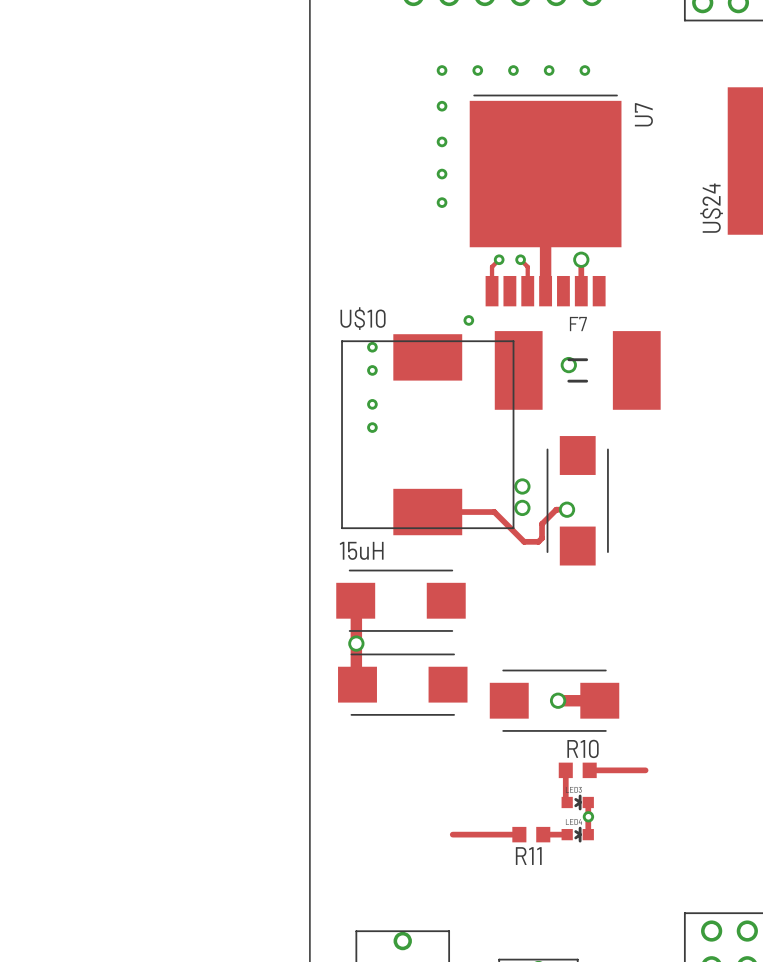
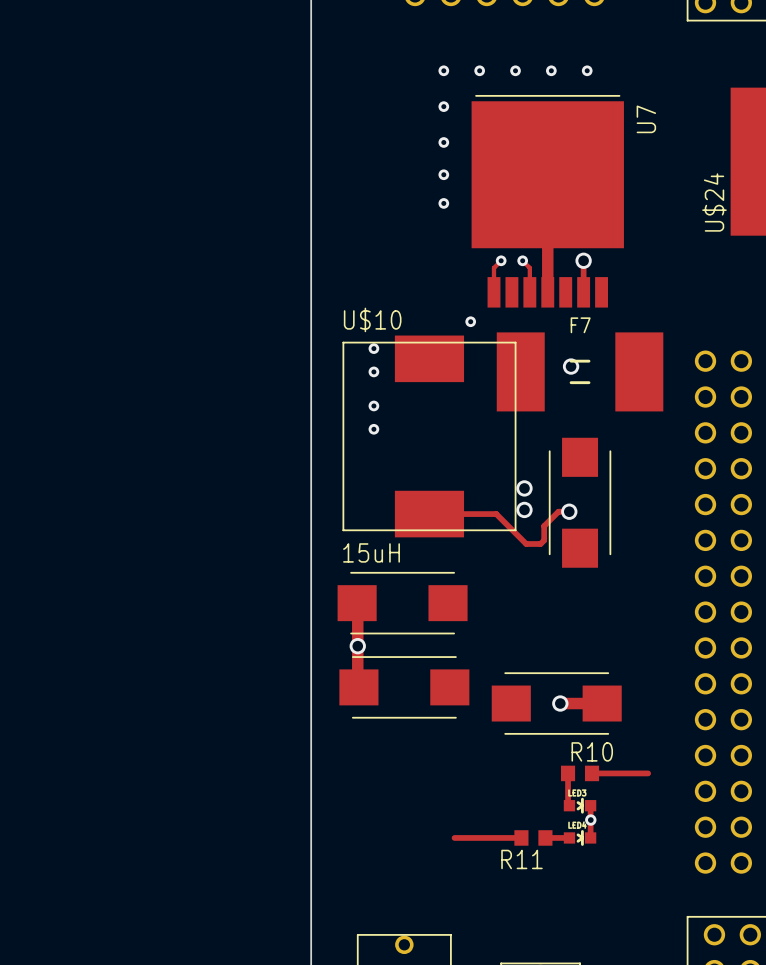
part: none -> (723, 612)

